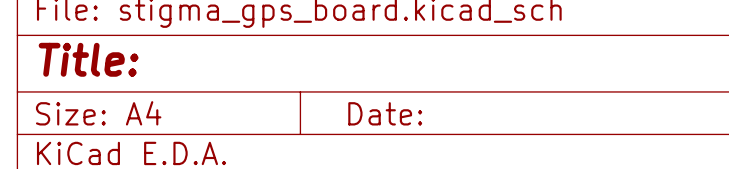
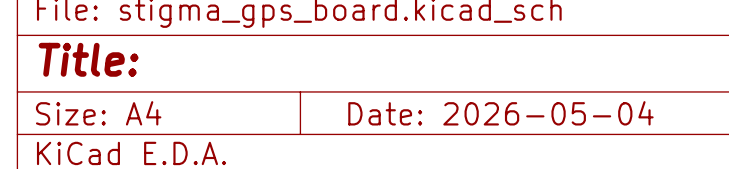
title block: Date: (385, 113) -> Date: 2026-05-04 (500, 113)

